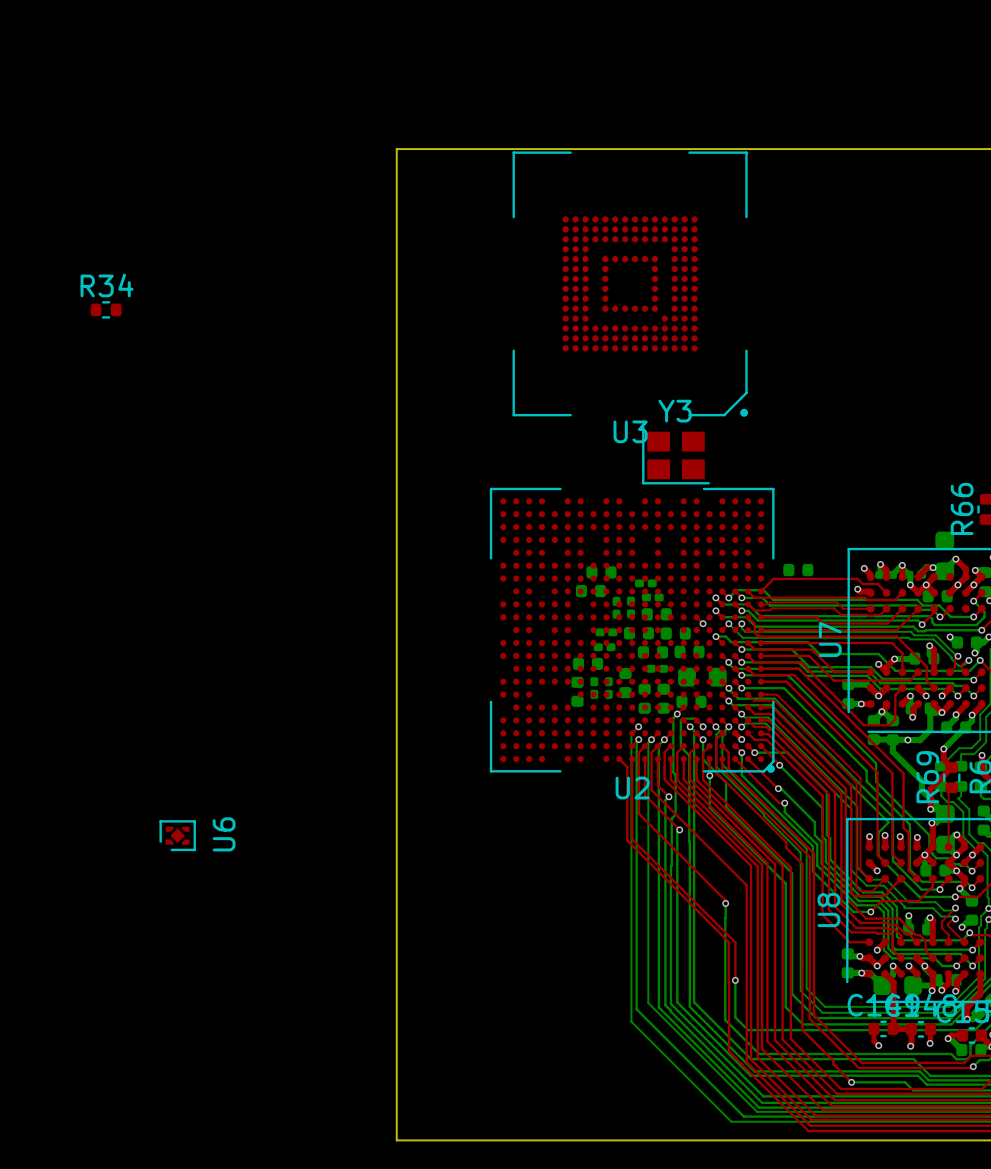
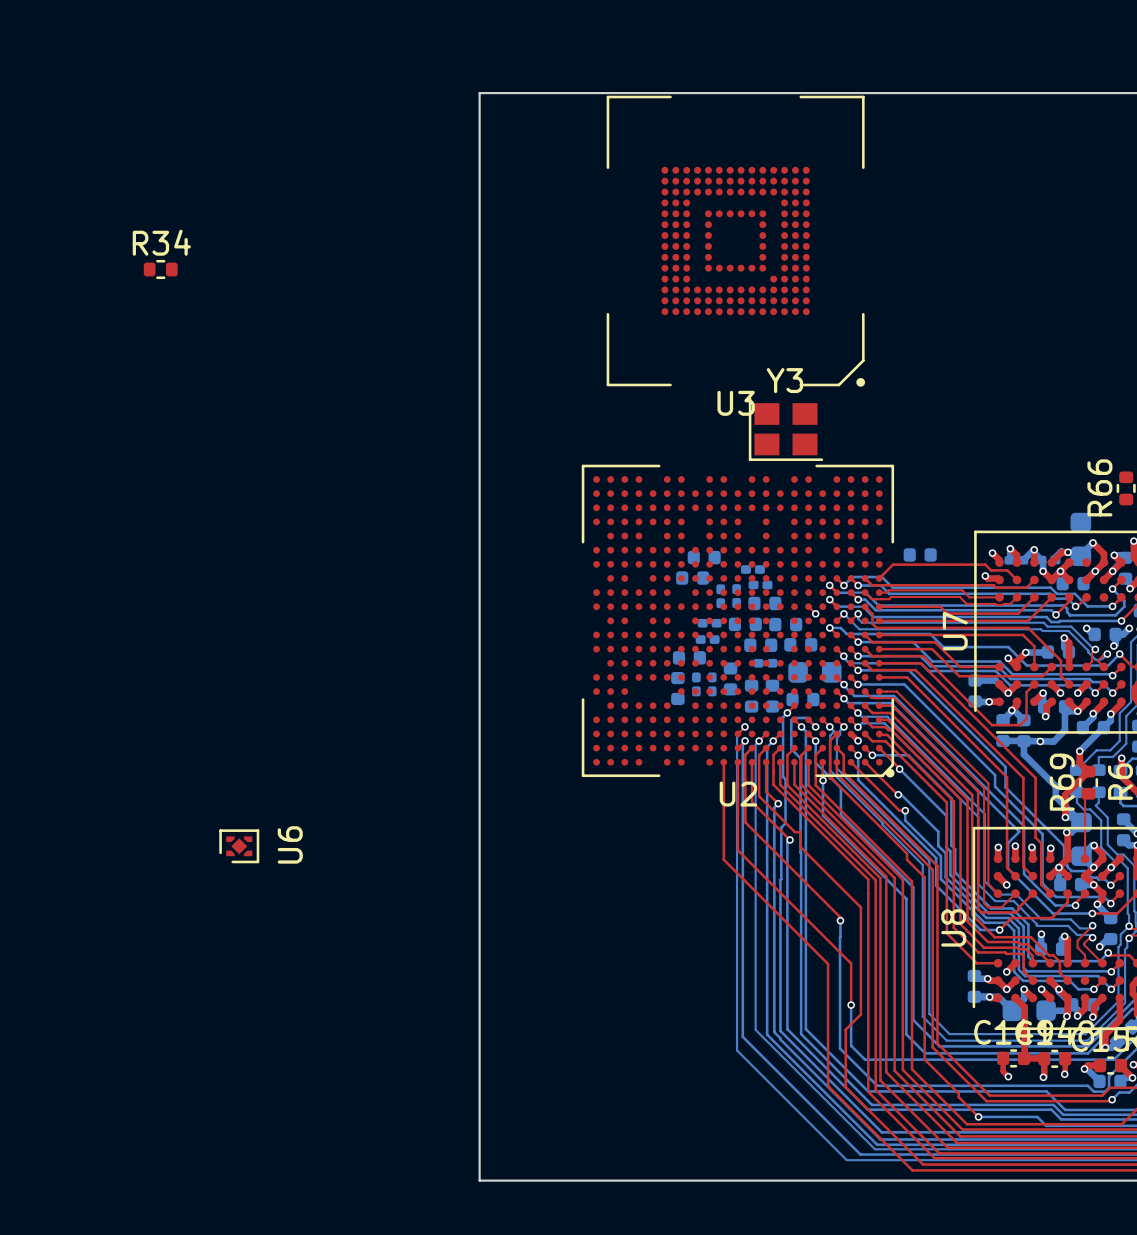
top track: (619, 759) (627, 767) (627, 840) (728, 942) (729, 1051) (808, 1131) -> (723, 762) (723, 859) (828, 963) (828, 1086) (912, 1170) (931, 1170)
top track: (684, 822) (746, 885) (746, 1062) (810, 1125) -> (795, 832) (800, 832) (800, 847) (860, 907) (860, 1014) (845, 1029) (845, 1087) (923, 1164) (933, 1164)

